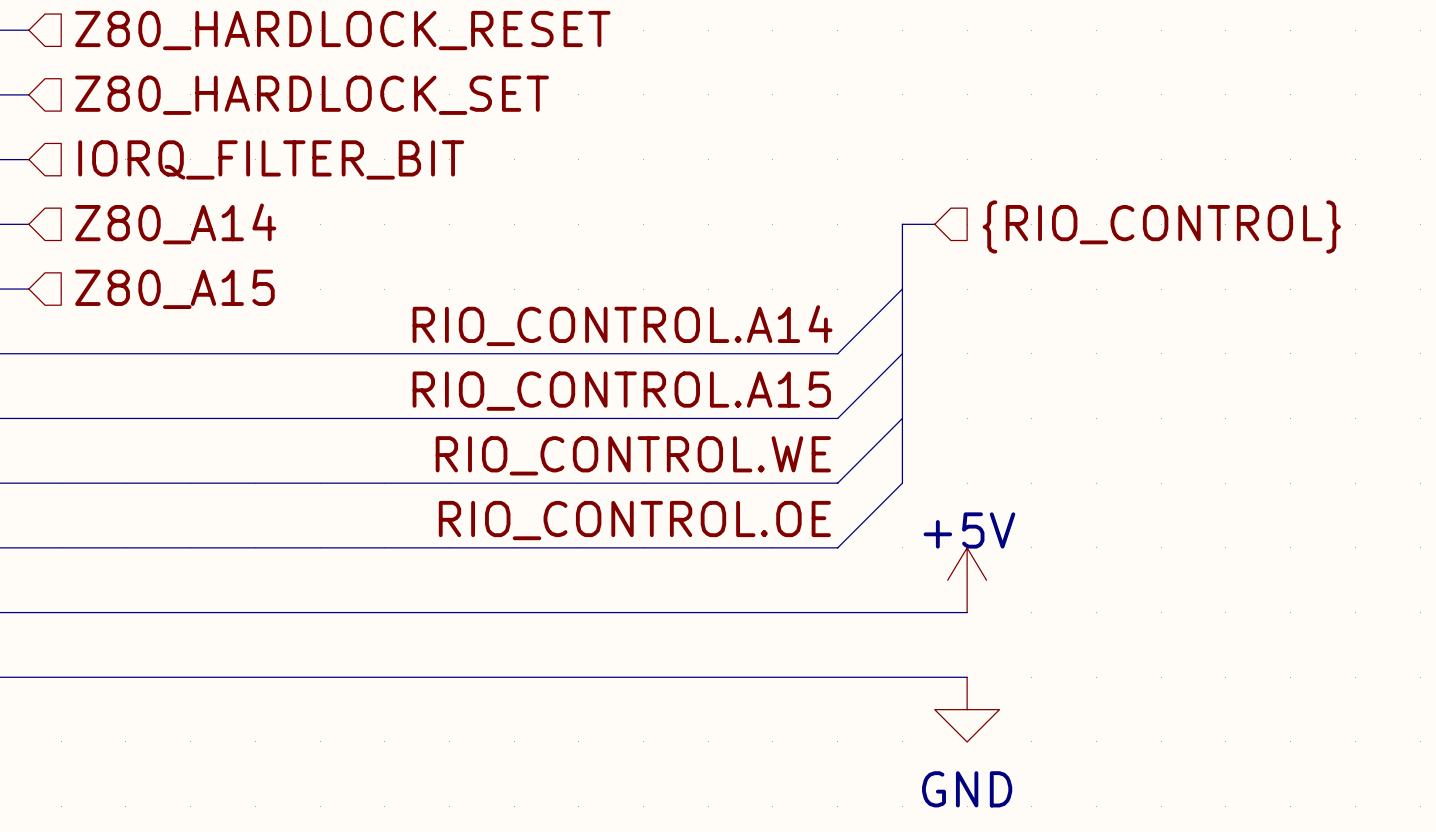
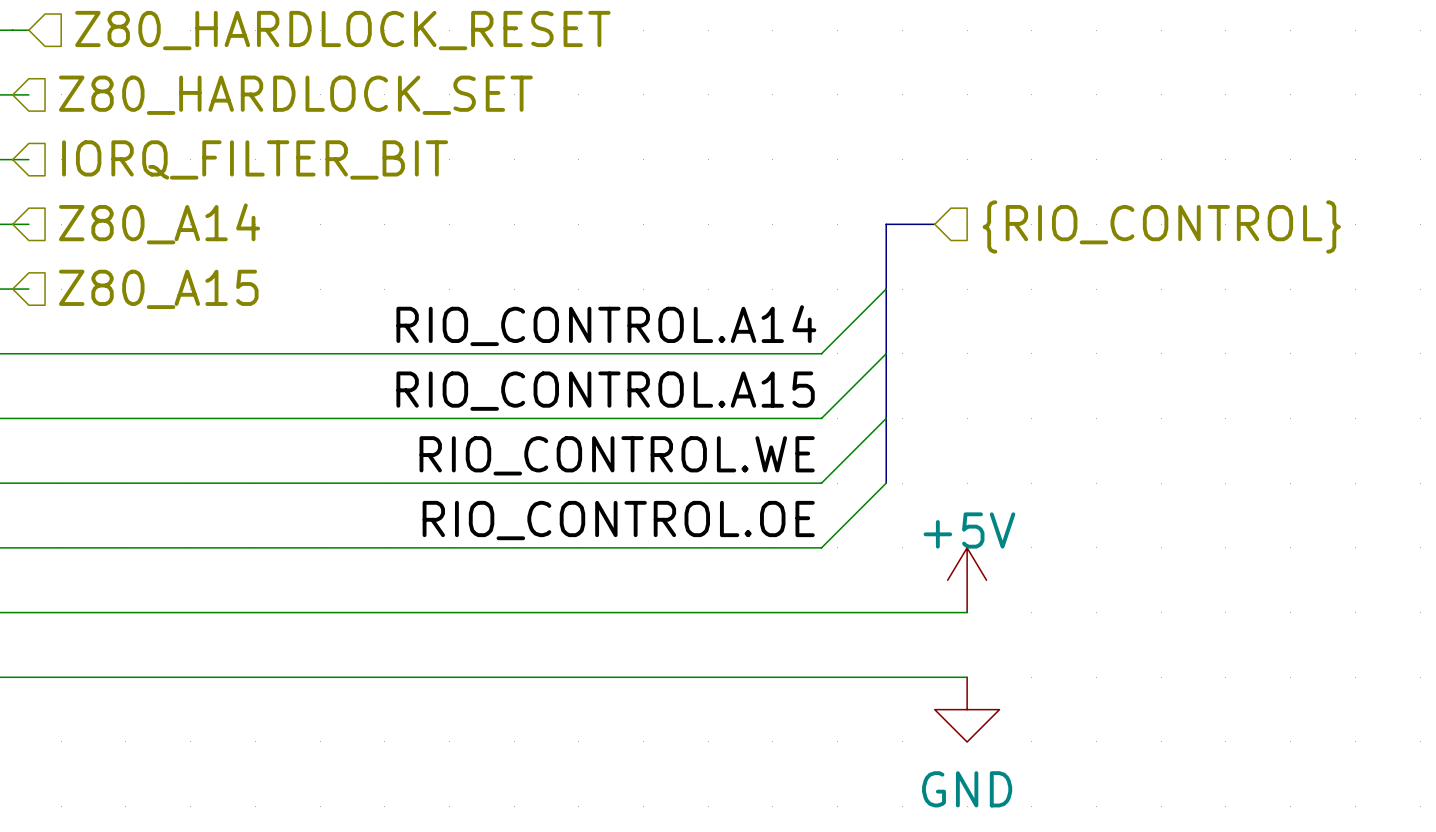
hierarchical label position: Z80_HARDLOCK_SET (312, 95) -> Z80_HARDLOCK_SET (295, 95)
hierarchical label position: IORQ_FILTER_BIT (271, 159) -> IORQ_FILTER_BIT (255, 159)
hierarchical label position: Z80_A14 (175, 223) -> Z80_A14 (159, 223)
bus: (902, 224) (902, 483) -> (902, 224) (886, 224) (886, 483)
hierarchical label position: Z80_A15 (174, 289) -> Z80_A15 (158, 289)
wire: (902, 289) (837, 353) (821, 353) -> (886, 289) (821, 353)
label position: RIO_CONTROL.A14 (622, 325) -> RIO_CONTROL.A14 (606, 325)
wire: (902, 353) (837, 418) (821, 418) -> (886, 353) (821, 418)
label position: RIO_CONTROL.A15 (621, 391) -> RIO_CONTROL.A15 (605, 391)
wire: (902, 418) (837, 483) (821, 483) -> (886, 418) (821, 483)
label position: RIO_CONTROL.WE (633, 455) -> RIO_CONTROL.WE (617, 455)
wire: (902, 483) (837, 547) (821, 547) -> (886, 483) (821, 547)
label position: RIO_CONTROL.OE (634, 520) -> RIO_CONTROL.OE (618, 520)

